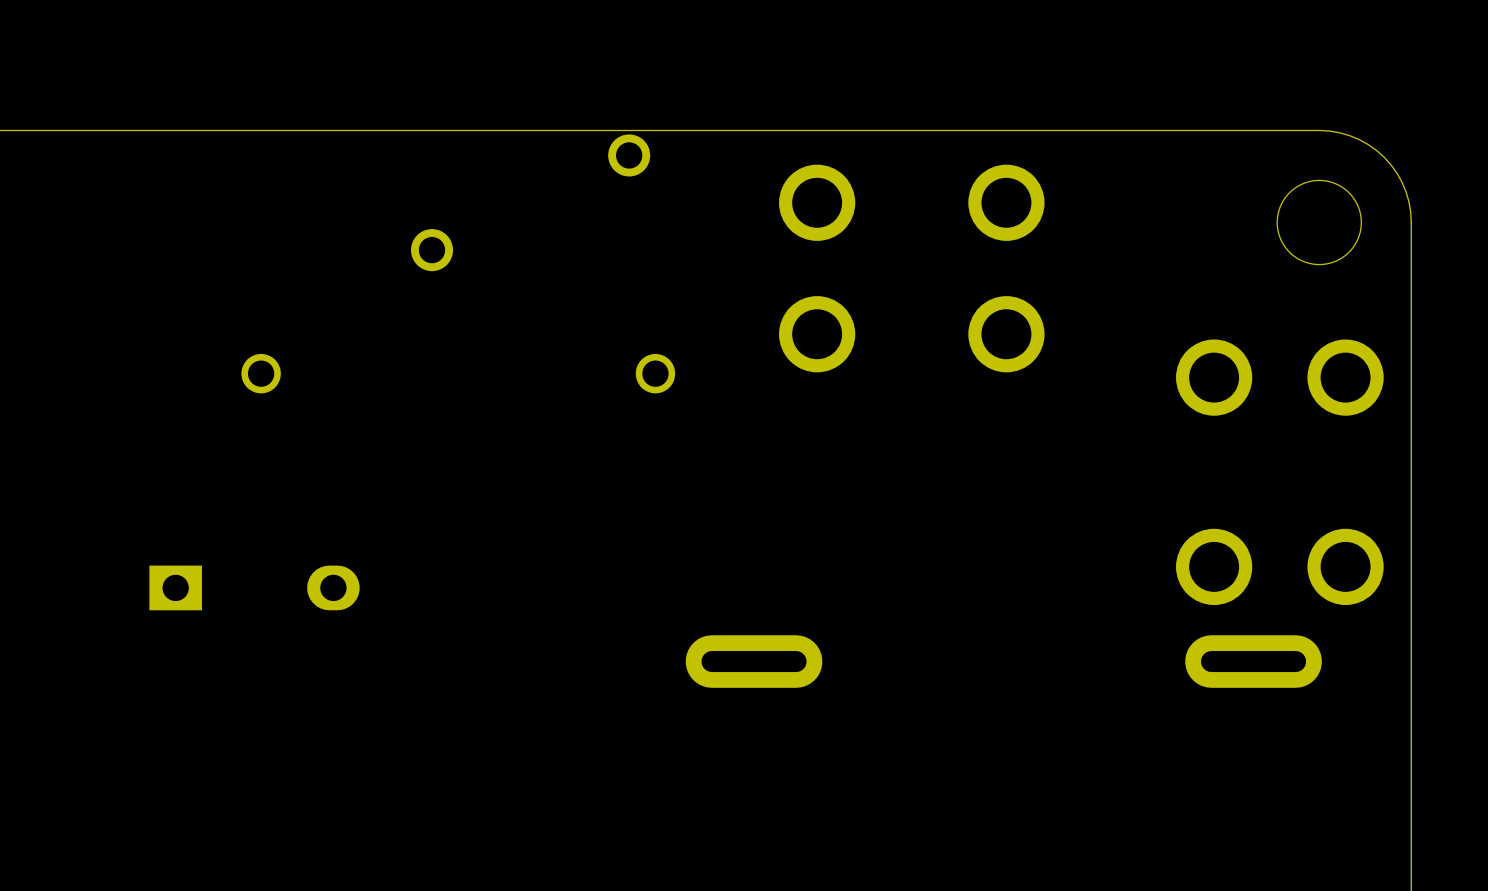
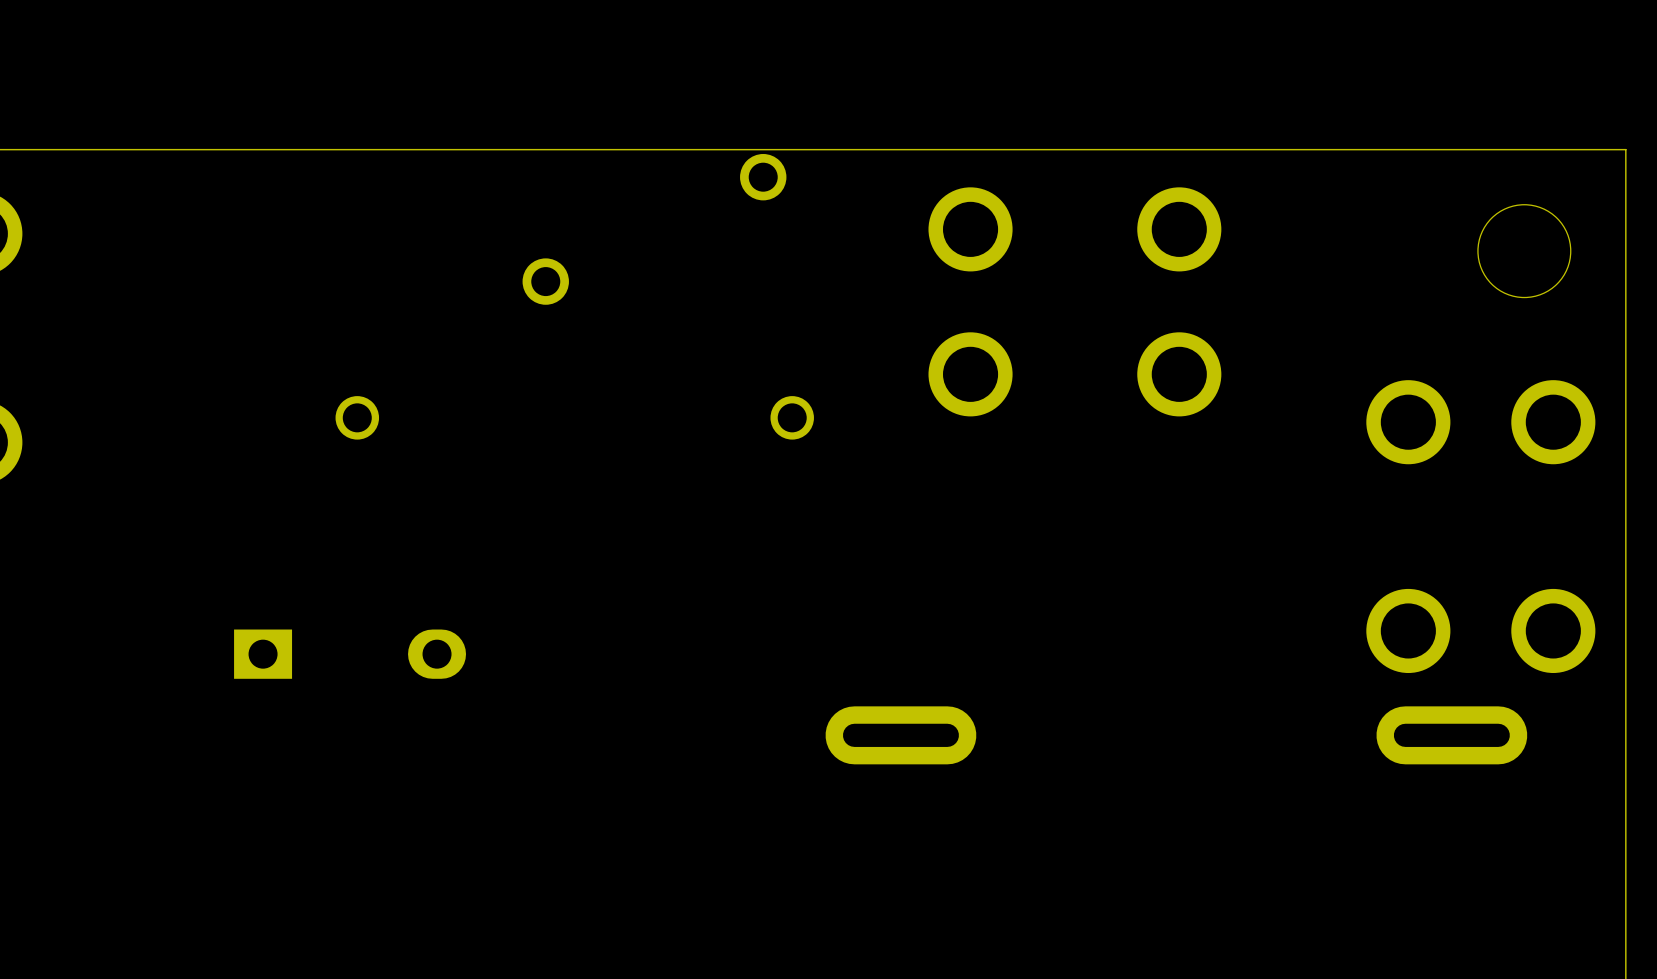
board edge: (1319, 130) (1349, 135) (1368, 144) (1384, 157) (1402, 182) (1408, 202) (1411, 222) -> (1524, 149) (1625, 149) (1625, 251)

